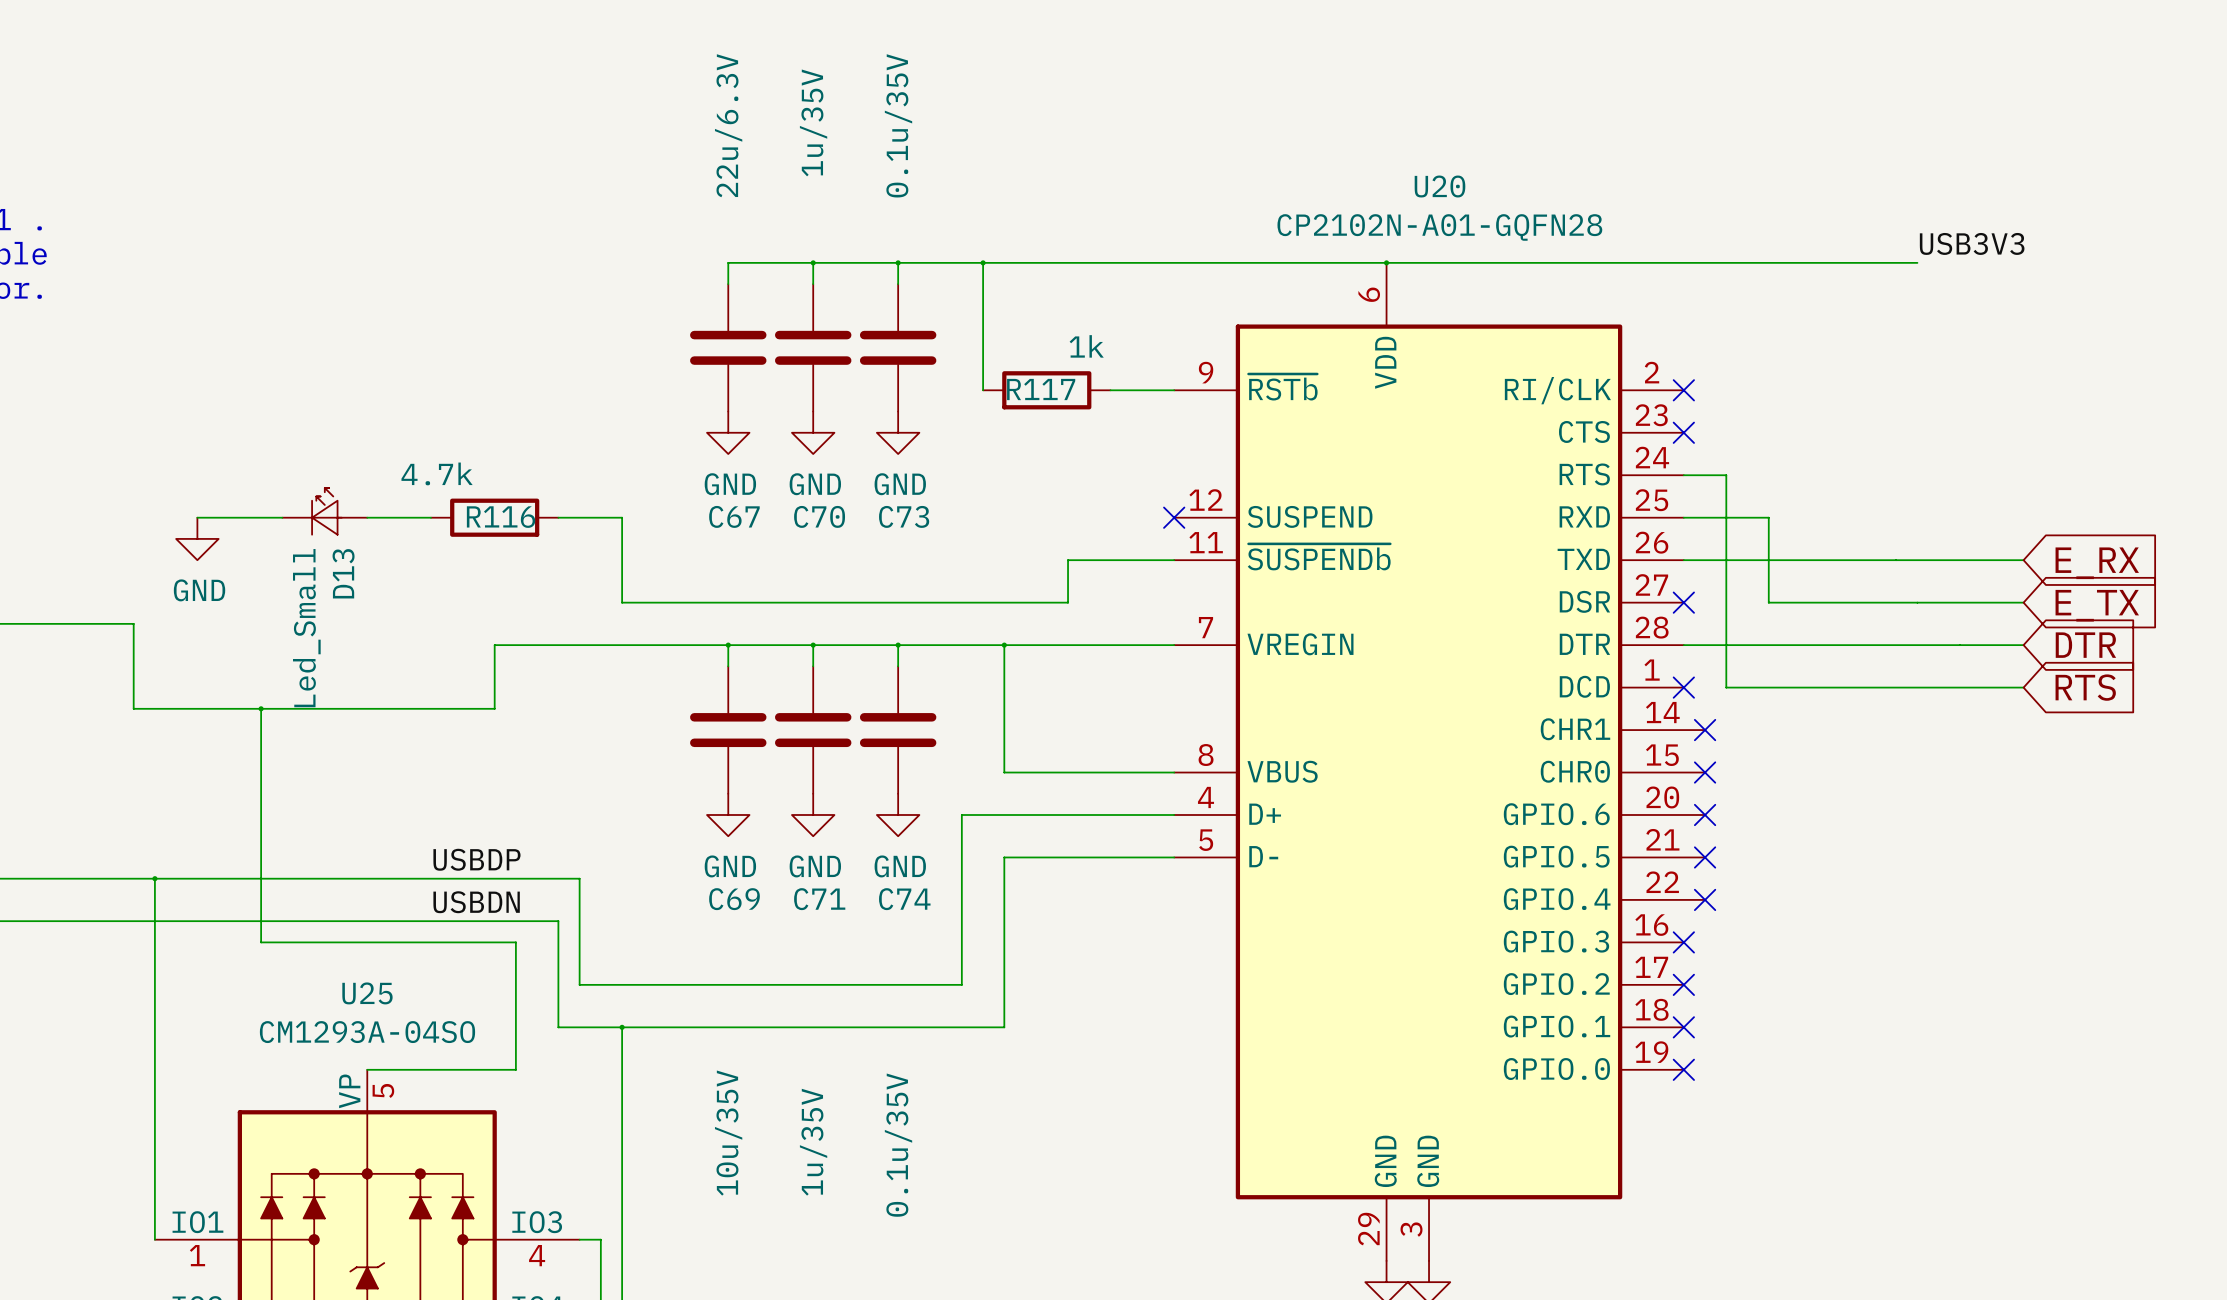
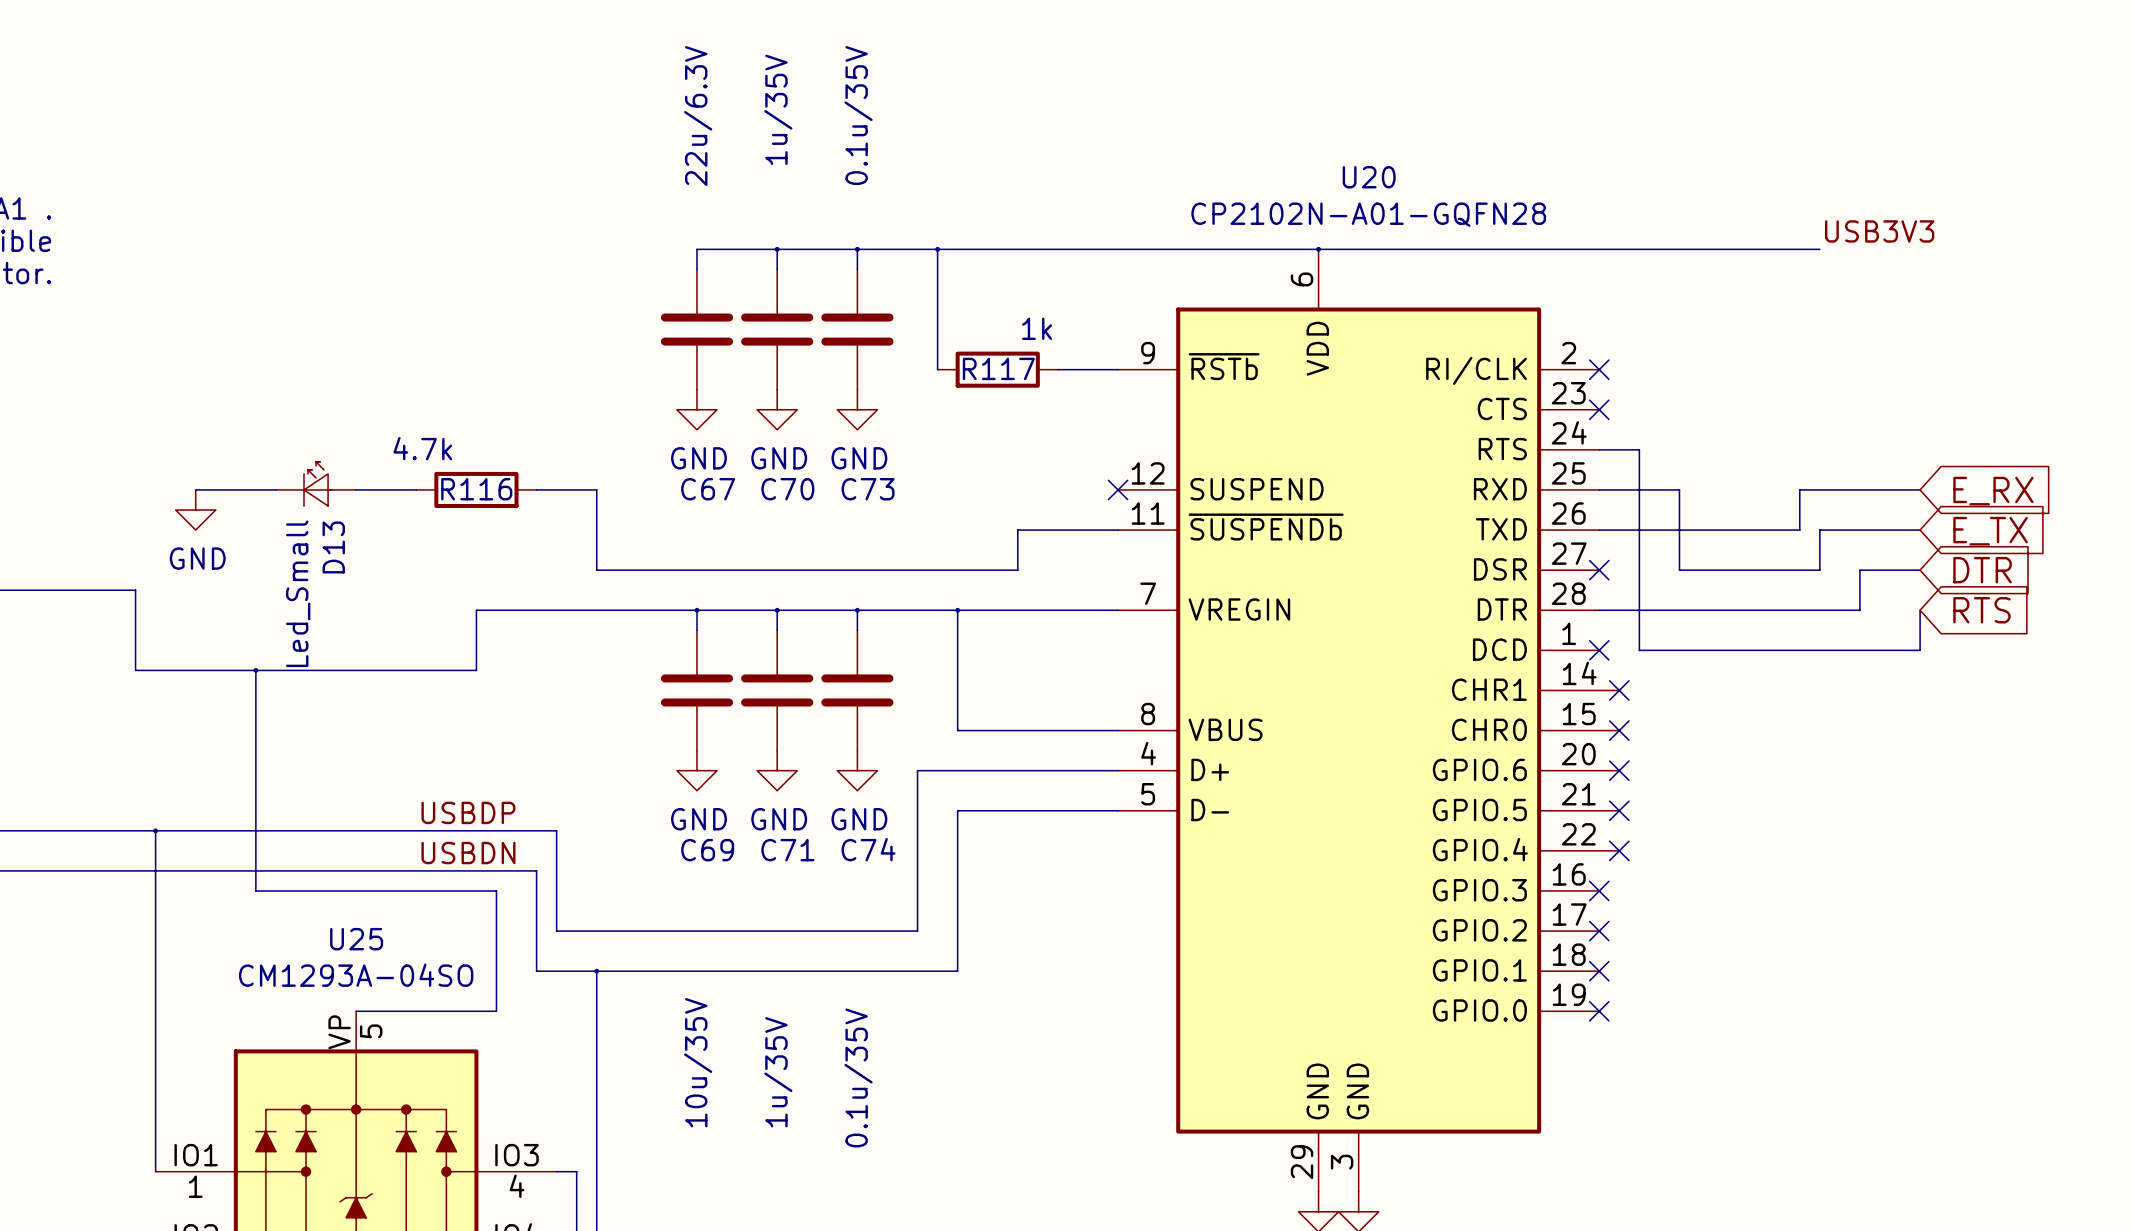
wire: none -> (1920, 489) (1799, 489) (1799, 530)
global label: none -> E_RX (1993, 491)
wire: (1896, 560) (1917, 560) -> (1819, 570) (1819, 530)
global label: E_RX (2097, 563) -> E_TX (1990, 531)
wire: (1917, 602) (1959, 602) -> (1859, 610) (1859, 570)
global label: E_TX (2097, 605) -> DTR (1982, 570)
wire: (1959, 645) (2023, 645) -> (1920, 650) (1920, 610)
global label: DTR (2085, 645) -> RTS (1981, 610)
global label: RTS (2085, 687) -> none

